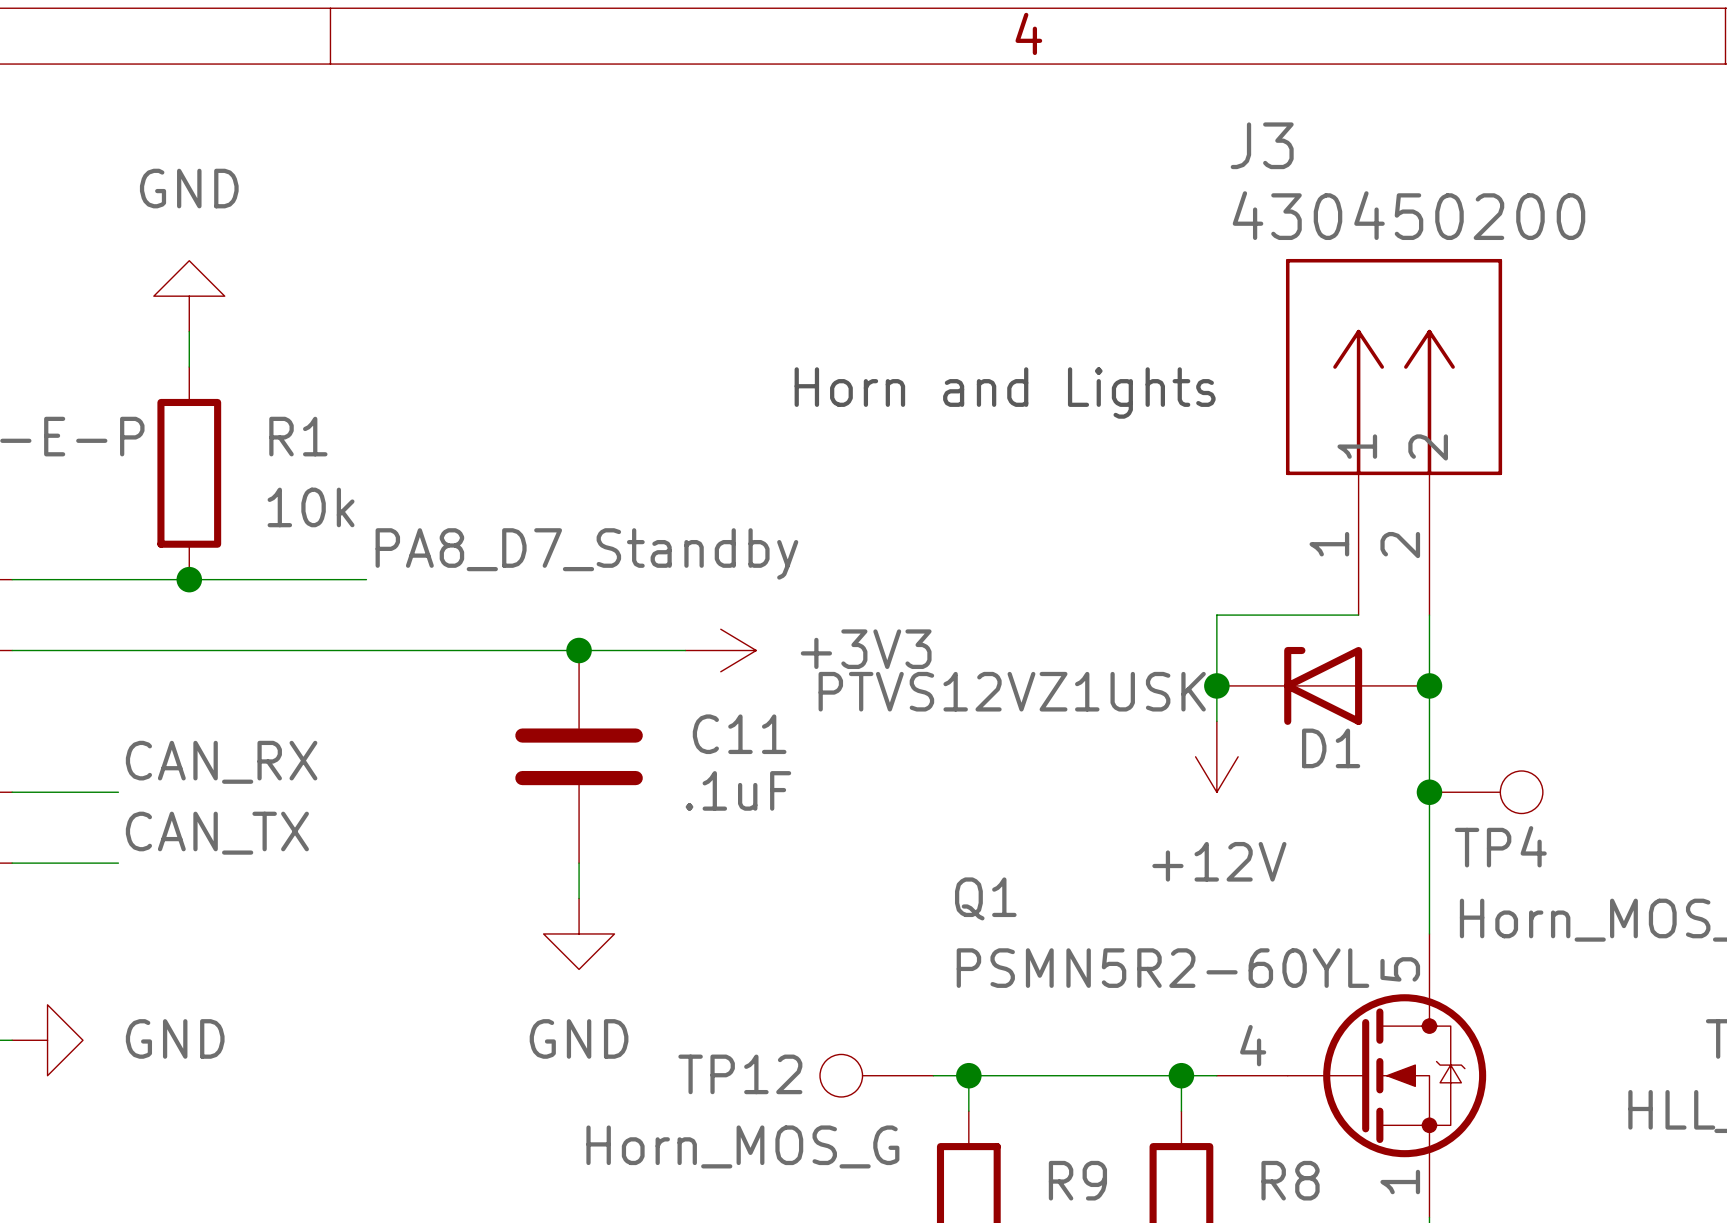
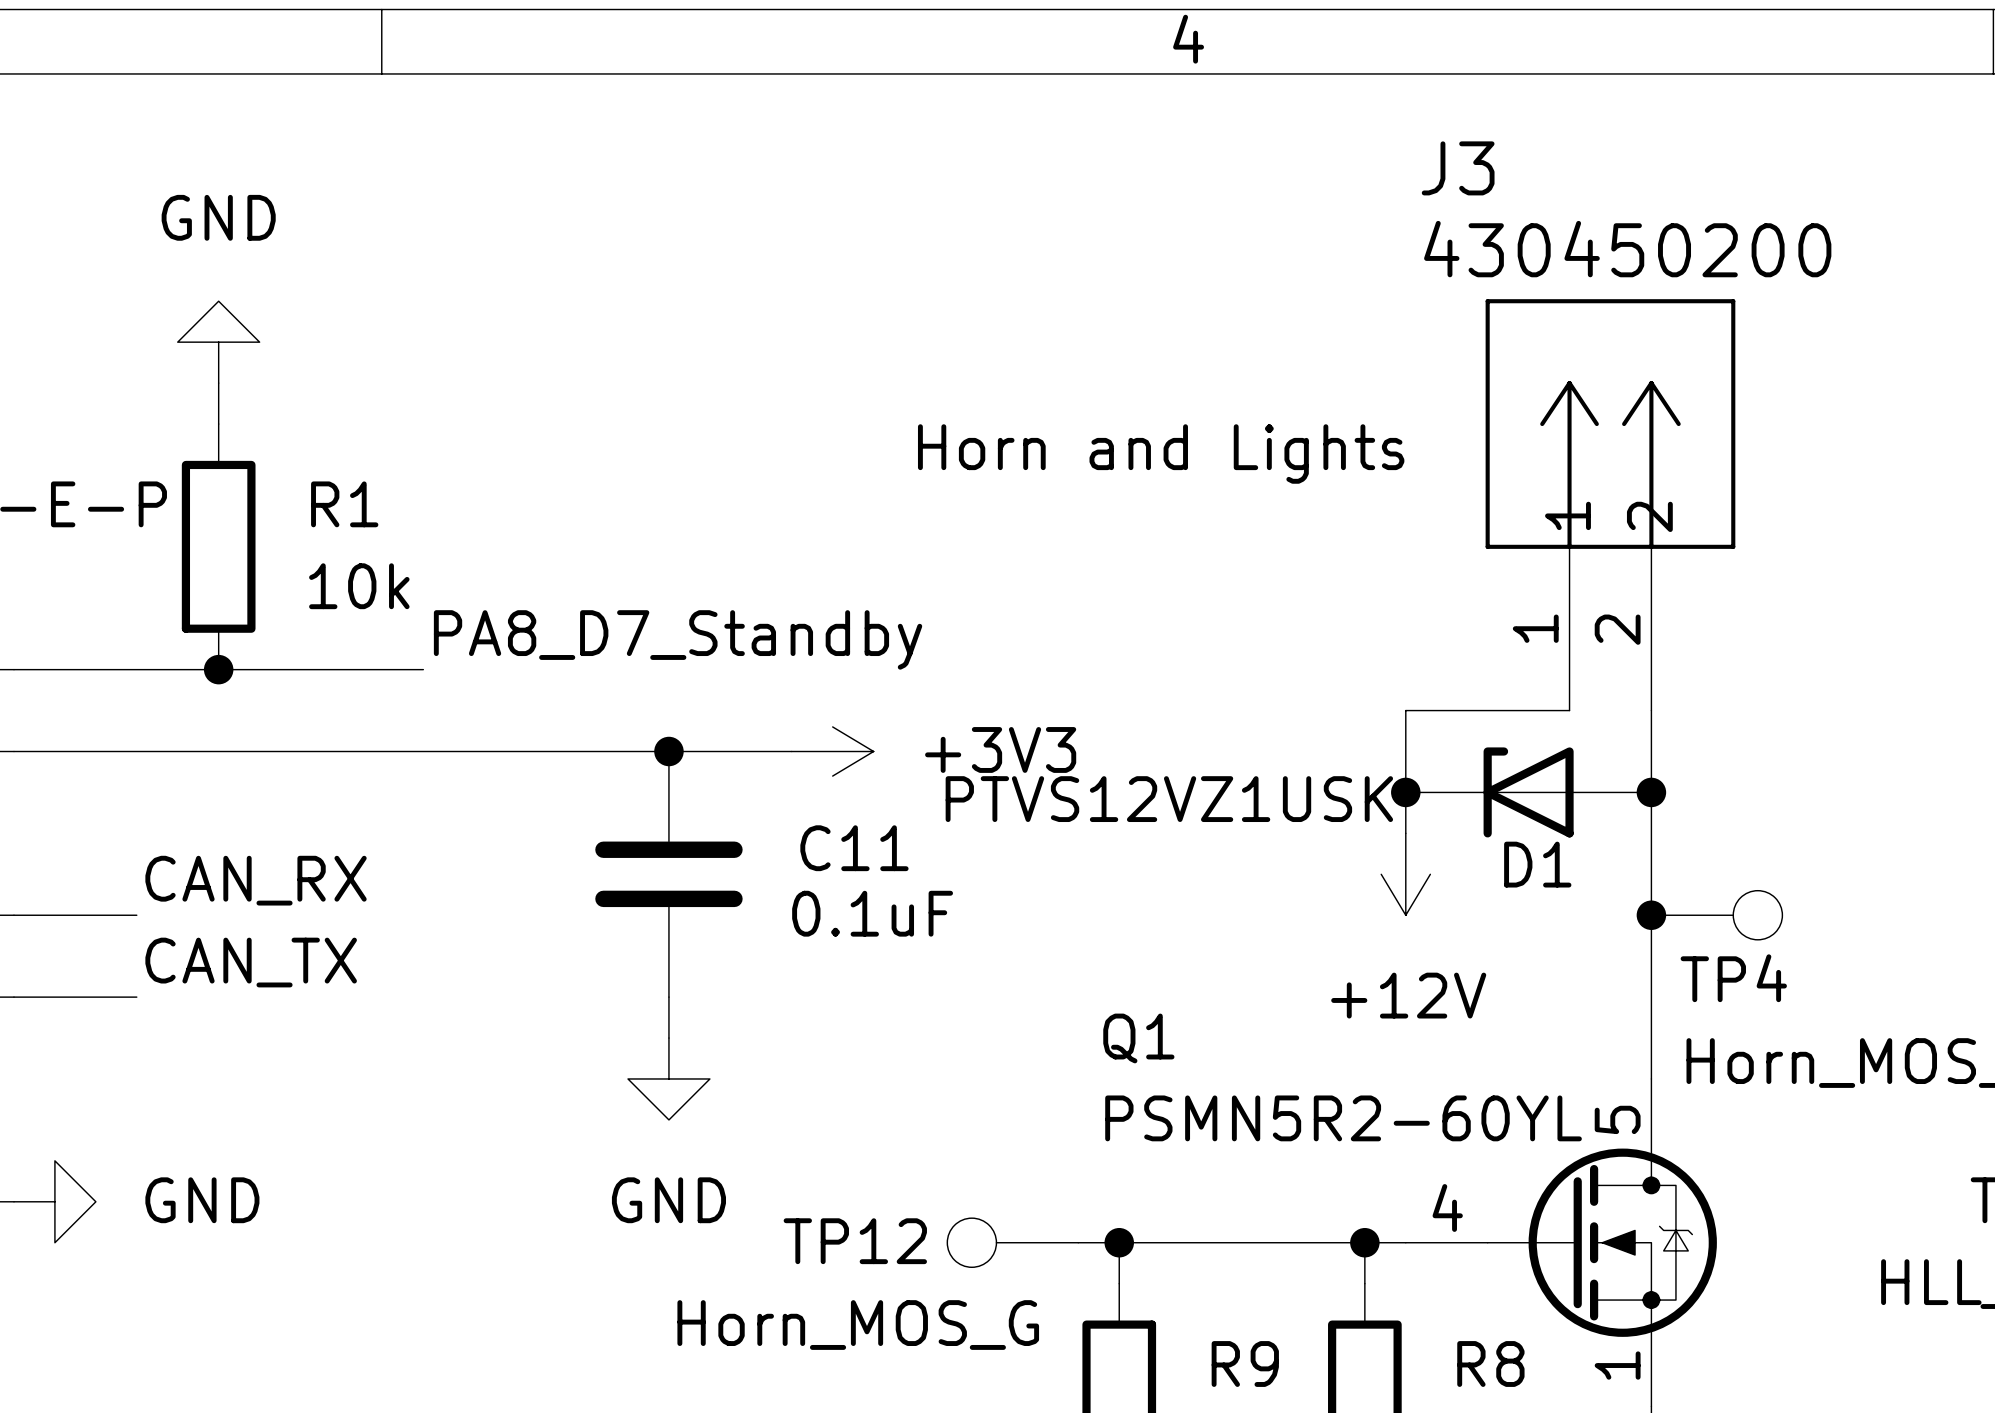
C11 value: .1uF (738, 790) -> 0.1uF (872, 913)

